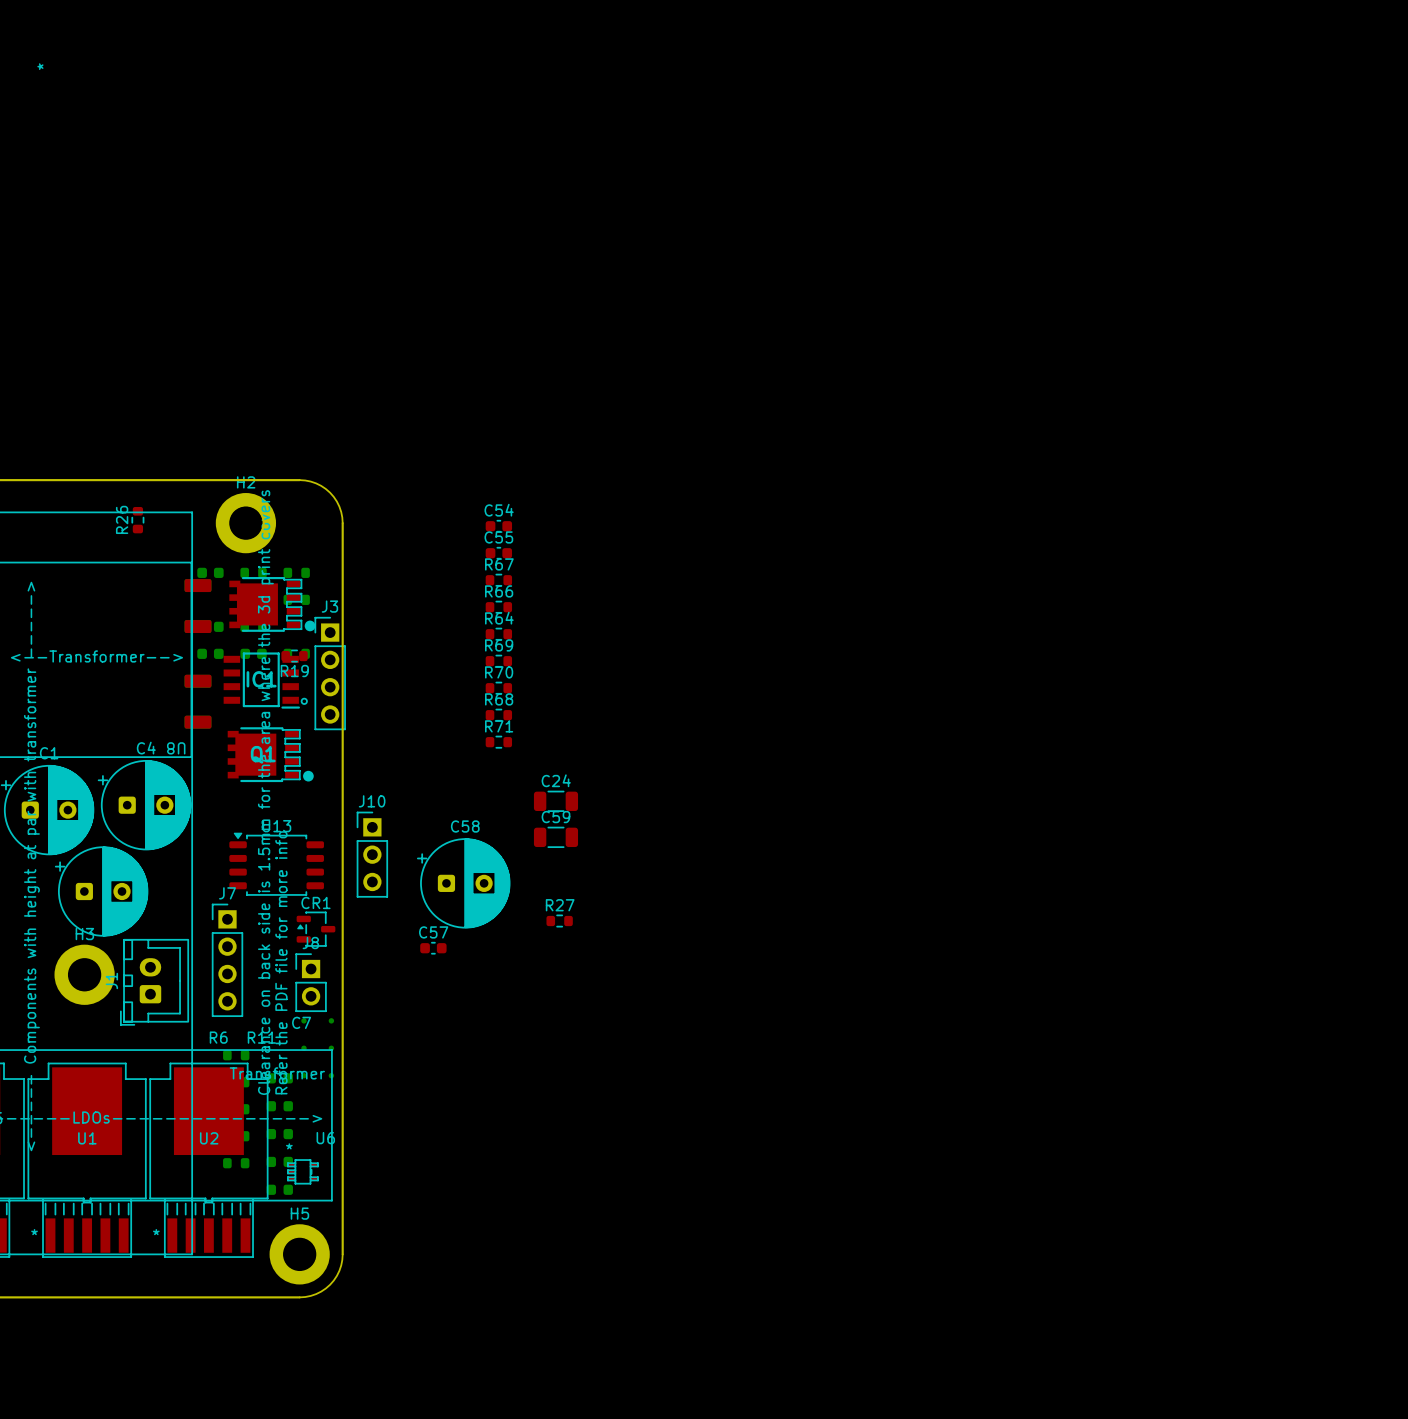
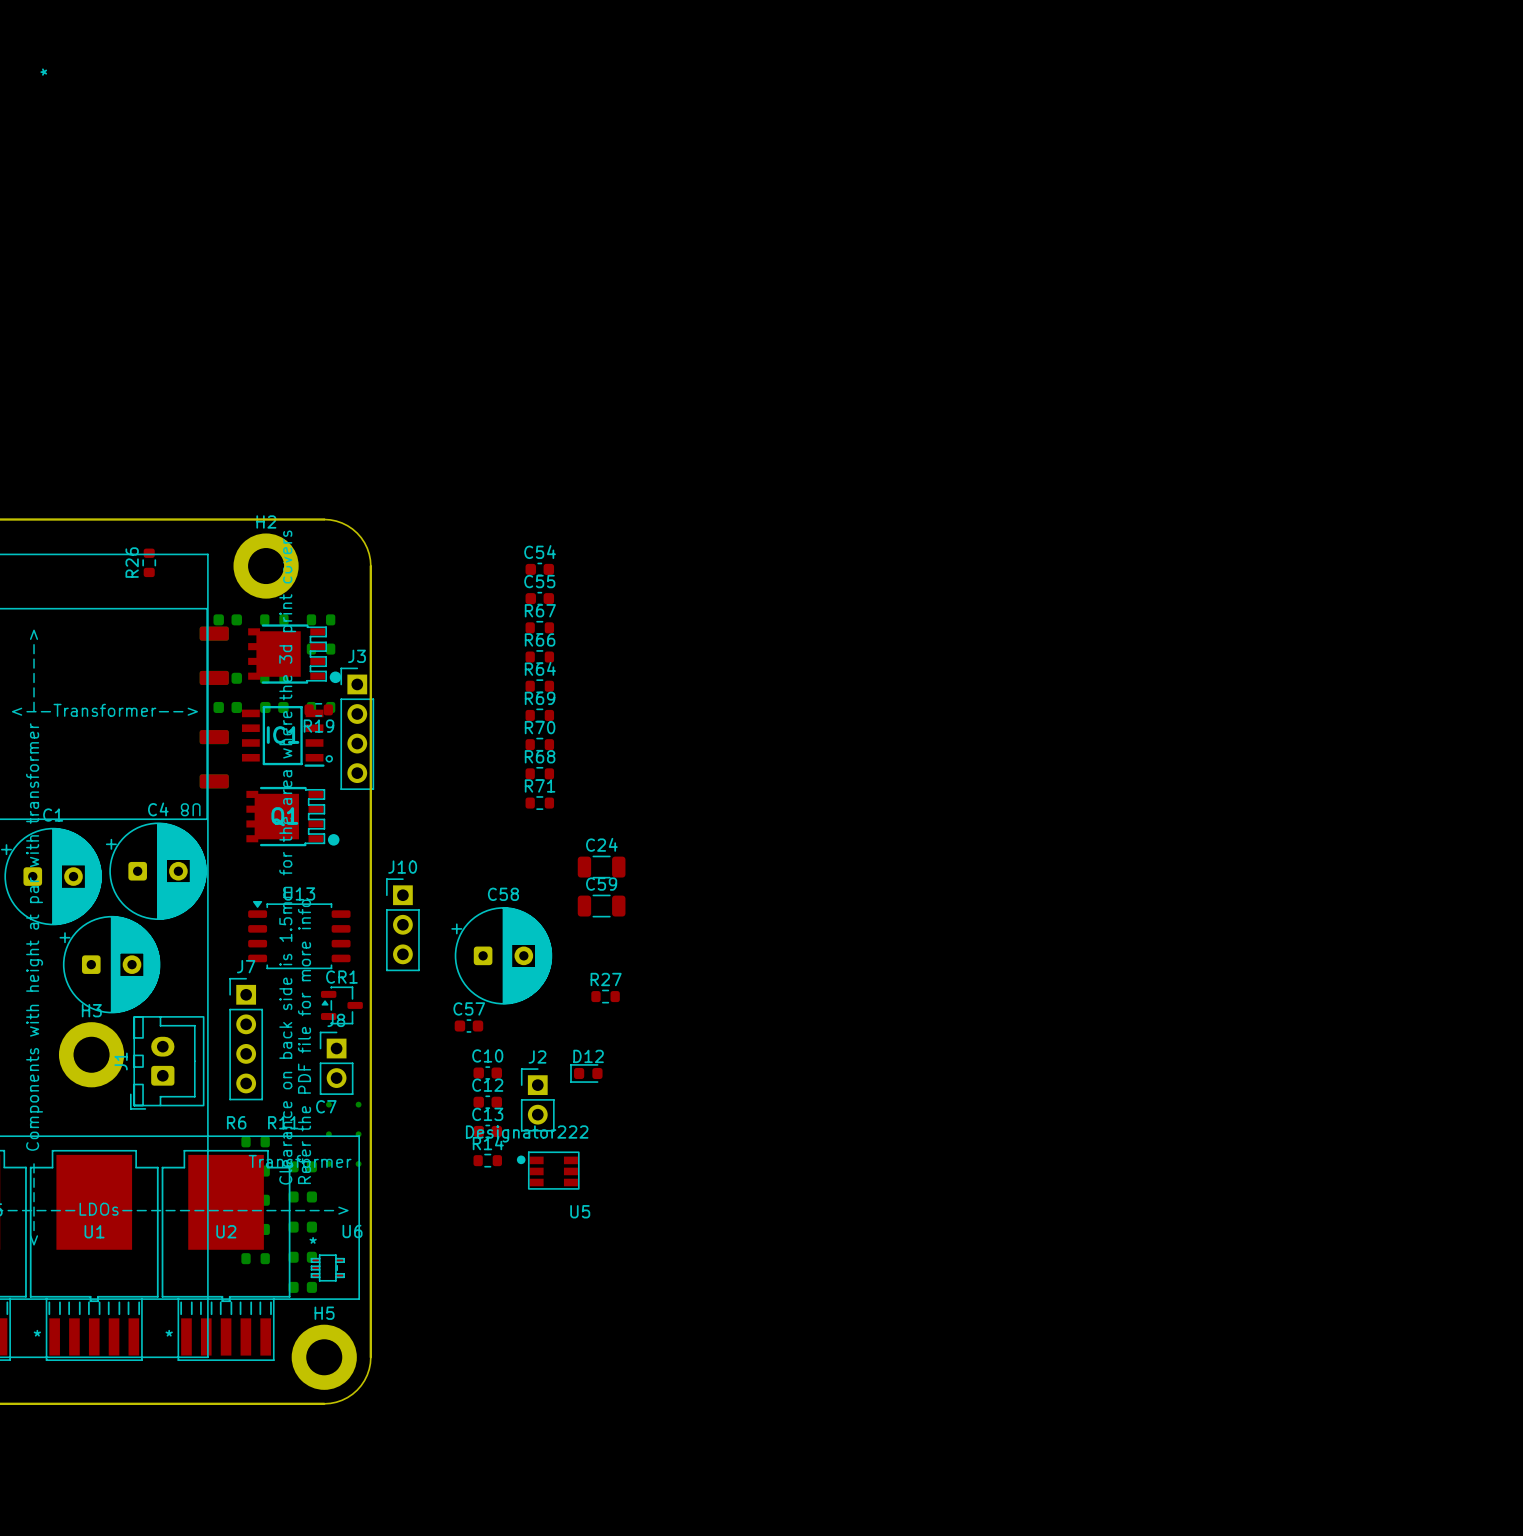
C10: none -> (487, 1073)
D12: none -> (586, 1073)
J2: none -> (537, 1099)
C12: none -> (487, 1102)
C13: none -> (487, 1131)
R14: none -> (487, 1160)
U5: none -> (548, 1170)

